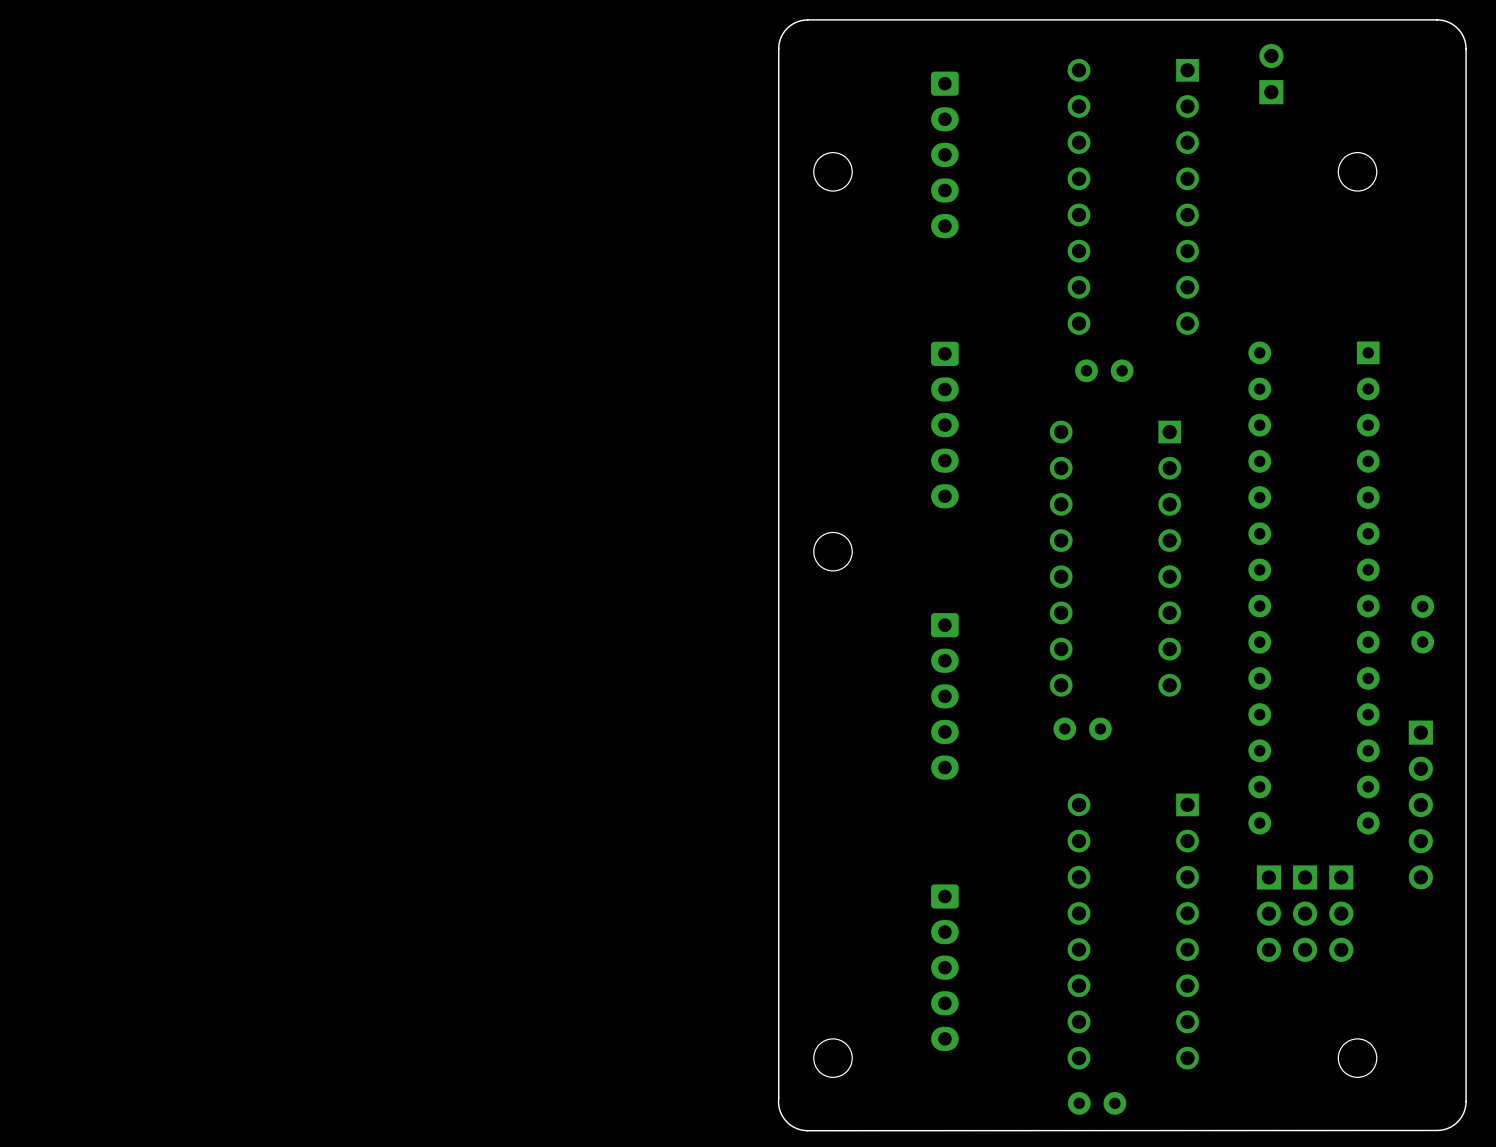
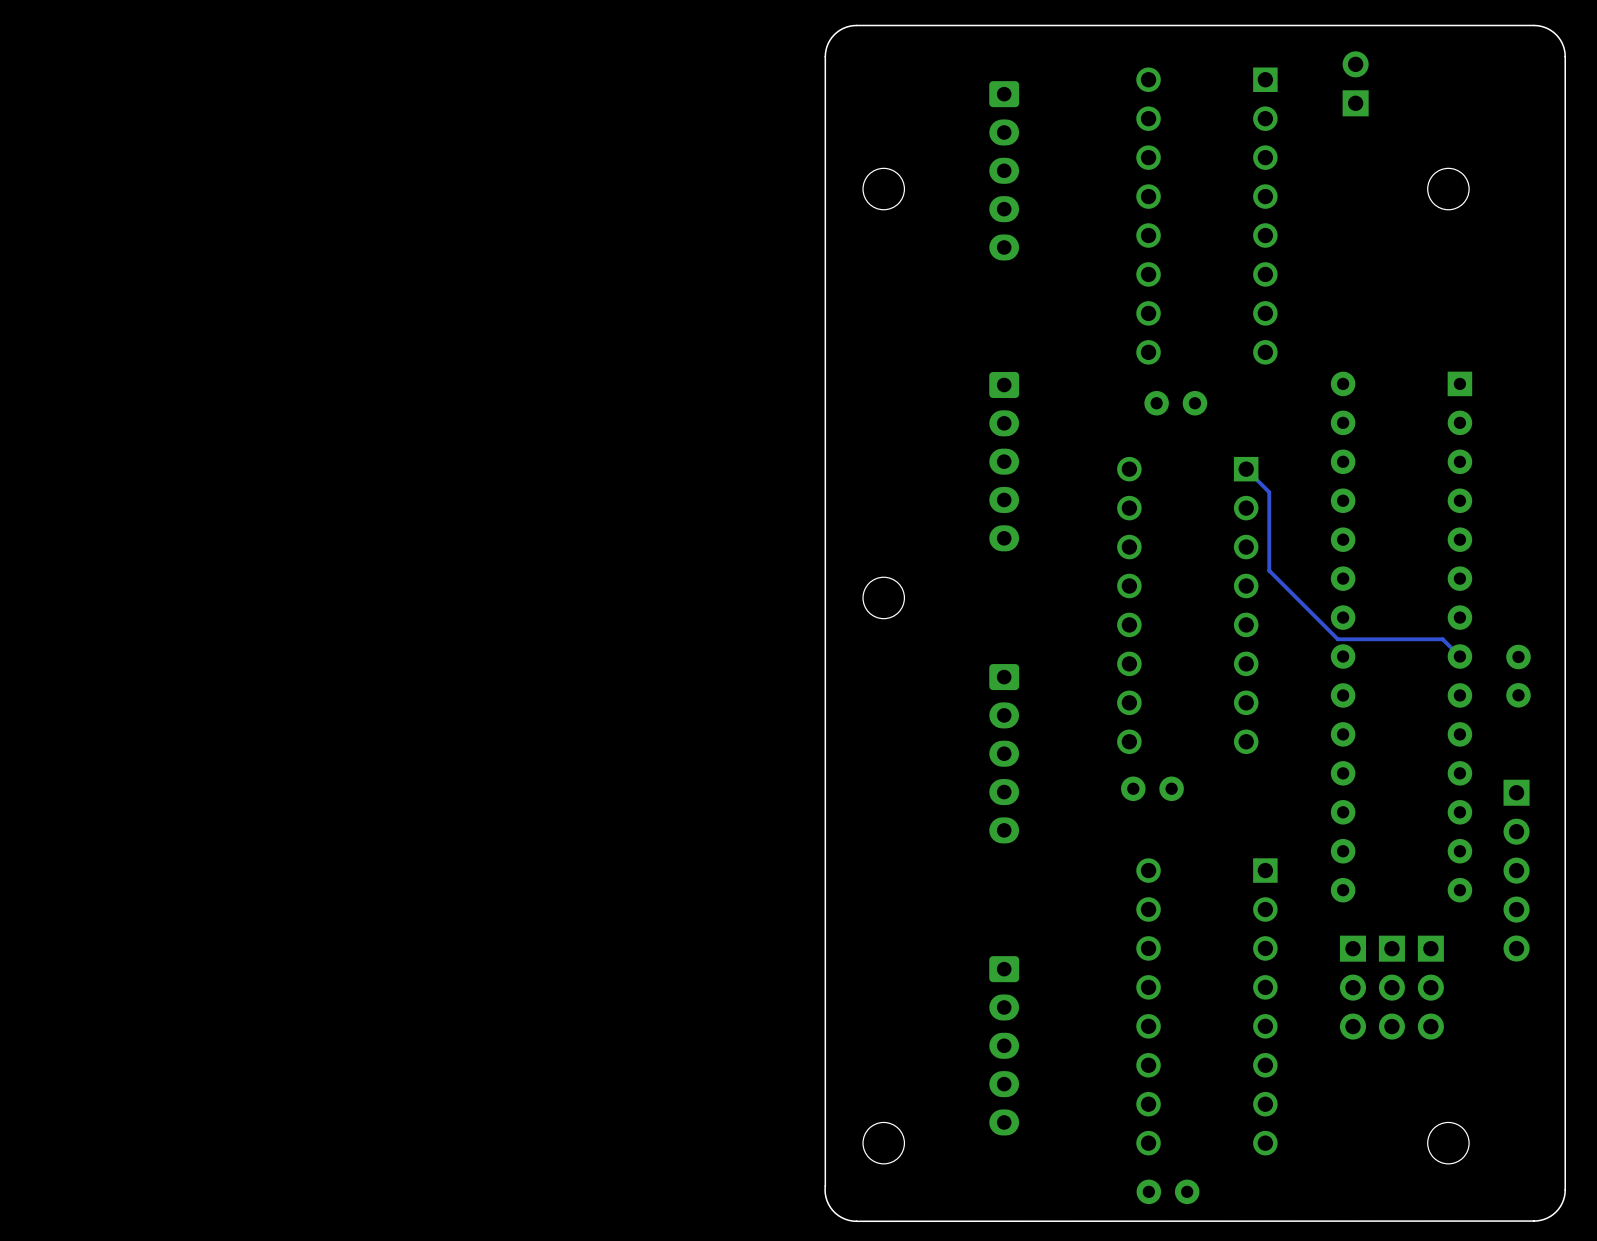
track: none -> (1246, 469) (1269, 492) (1269, 570) (1337, 639) (1442, 639) (1459, 656)

